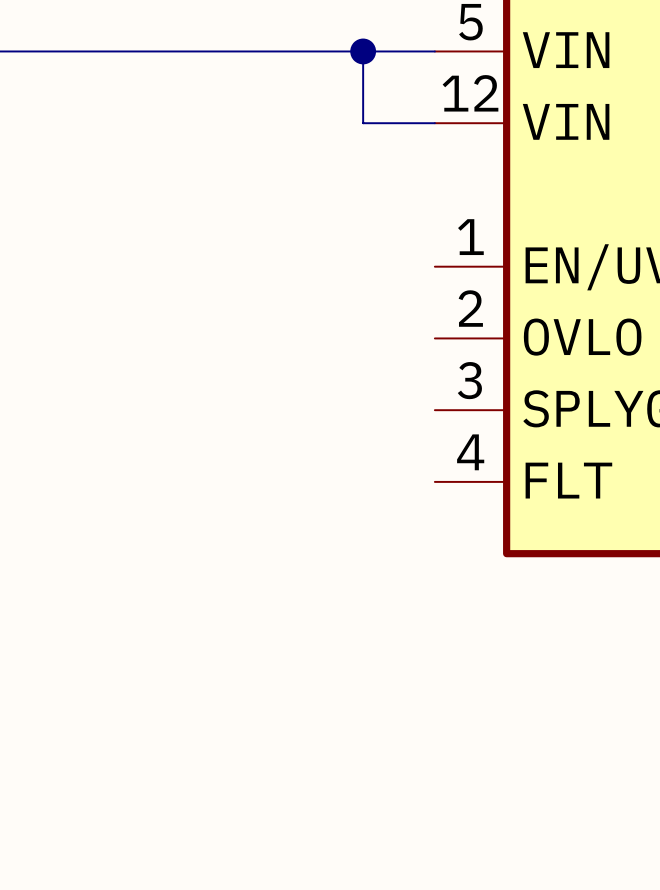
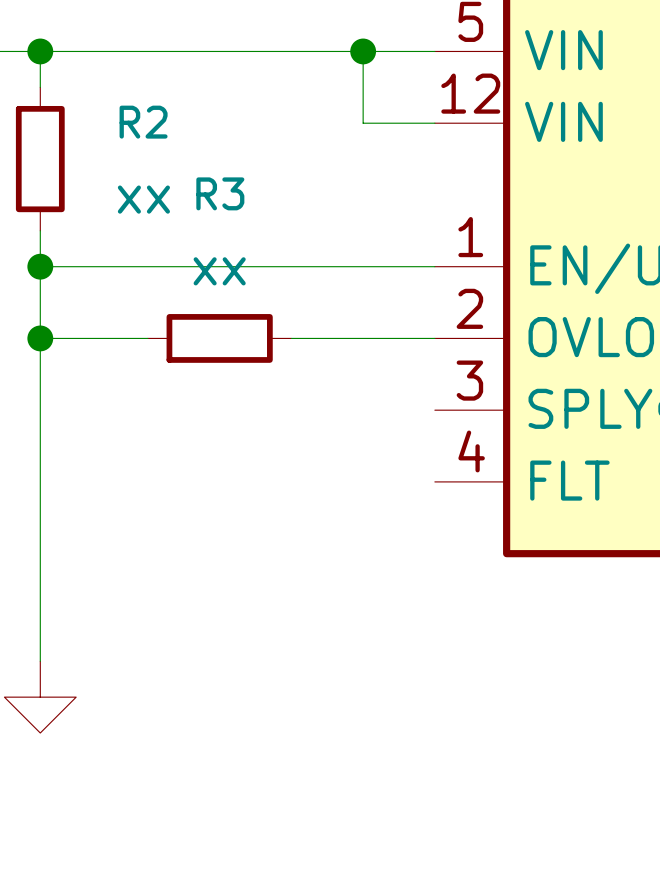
wire: none -> (40, 51) (40, 87)
junction: none -> (40, 51)
R2: none -> xx (40, 159)
wire: none -> (40, 230) (40, 661)
wire: none -> (40, 266) (434, 266)
junction: none -> (40, 266)
wire: none -> (40, 338) (147, 338)
junction: none -> (40, 338)
R3: none -> xx (219, 338)
wire: none -> (291, 338) (434, 338)
power symbol: none -> (40, 697)

